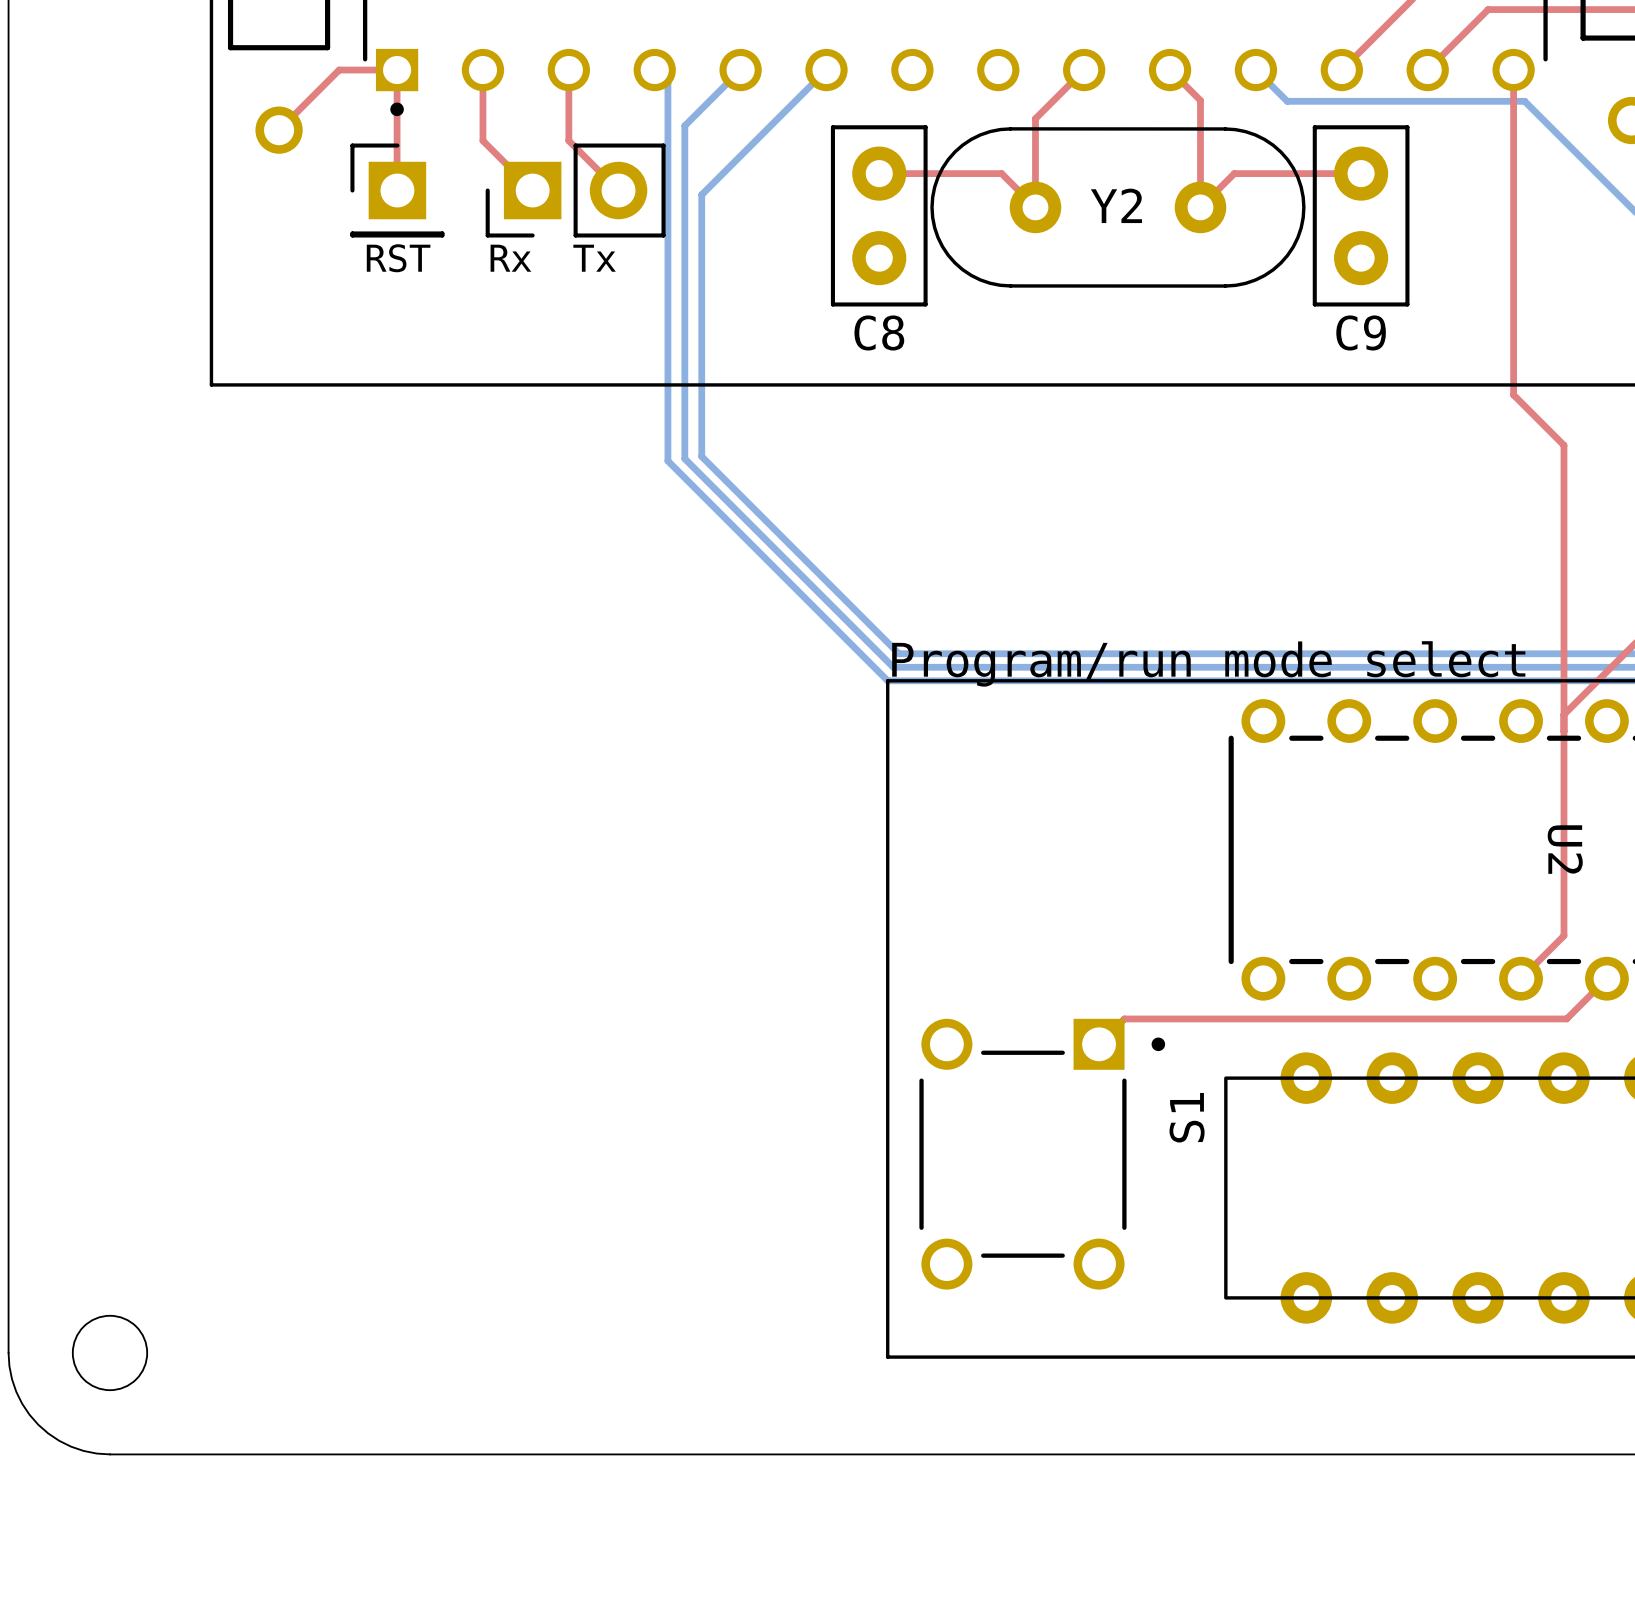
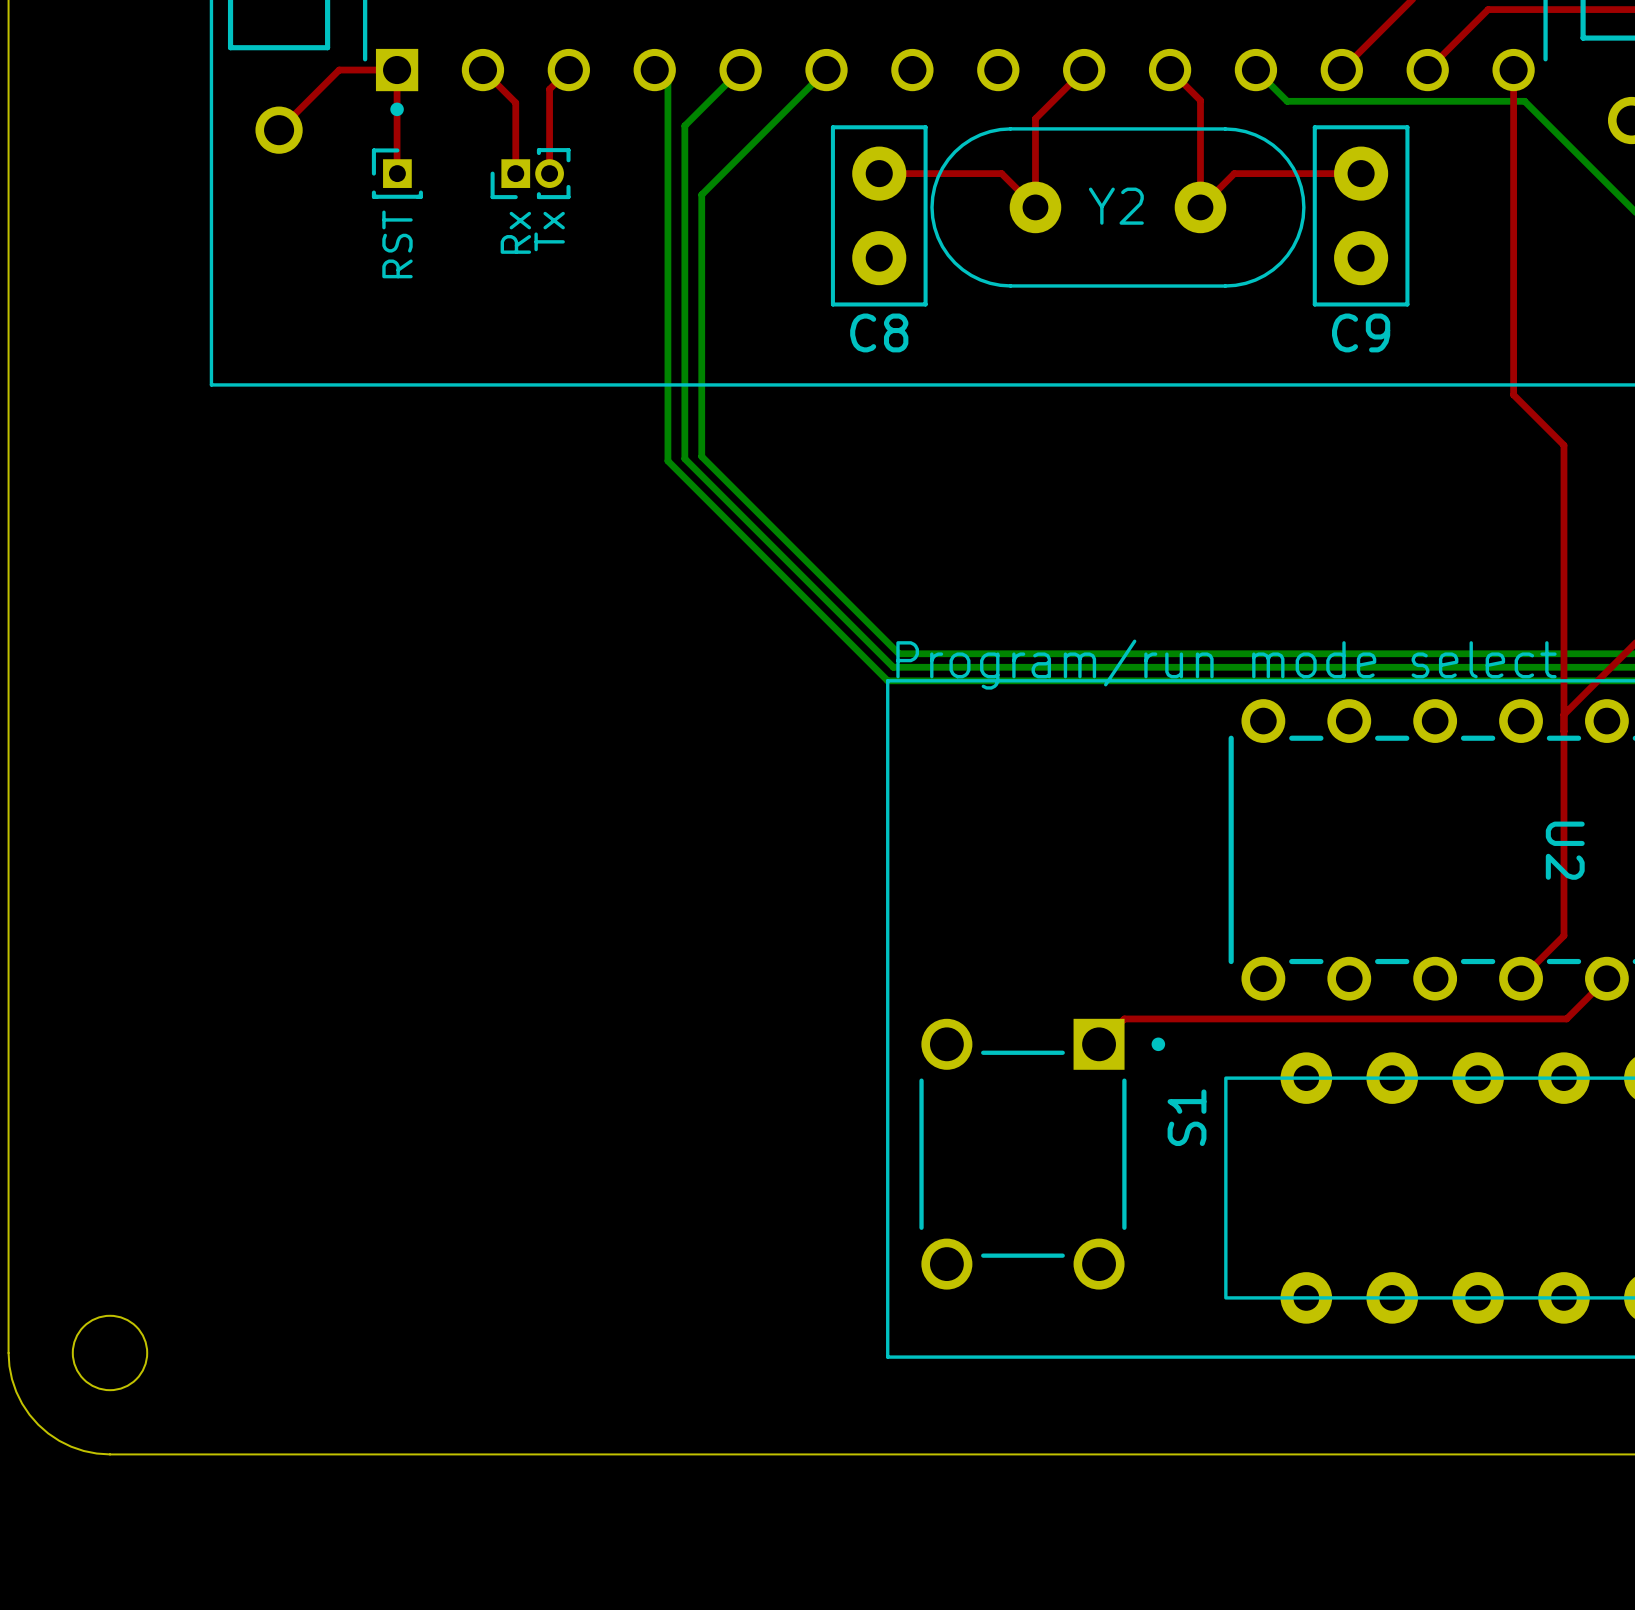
top track: (482, 70) (482, 140) (532, 190) -> (482, 70) (515, 102) (515, 173)
top track: (568, 70) (568, 140) (618, 190) -> (568, 70) (549, 89) (549, 173)
part footprint: [350, 143, 445, 238] -> [371, 148, 423, 199]
part: none -> (530, 173)
part: (575, 190) -> none
text rotation: 0° (398, 258) -> 90° counterclockwise (397, 244)
text rotation: 0° (510, 258) -> 90° counterclockwise (515, 232)
text rotation: 0° (594, 258) -> 90° counterclockwise (549, 231)

